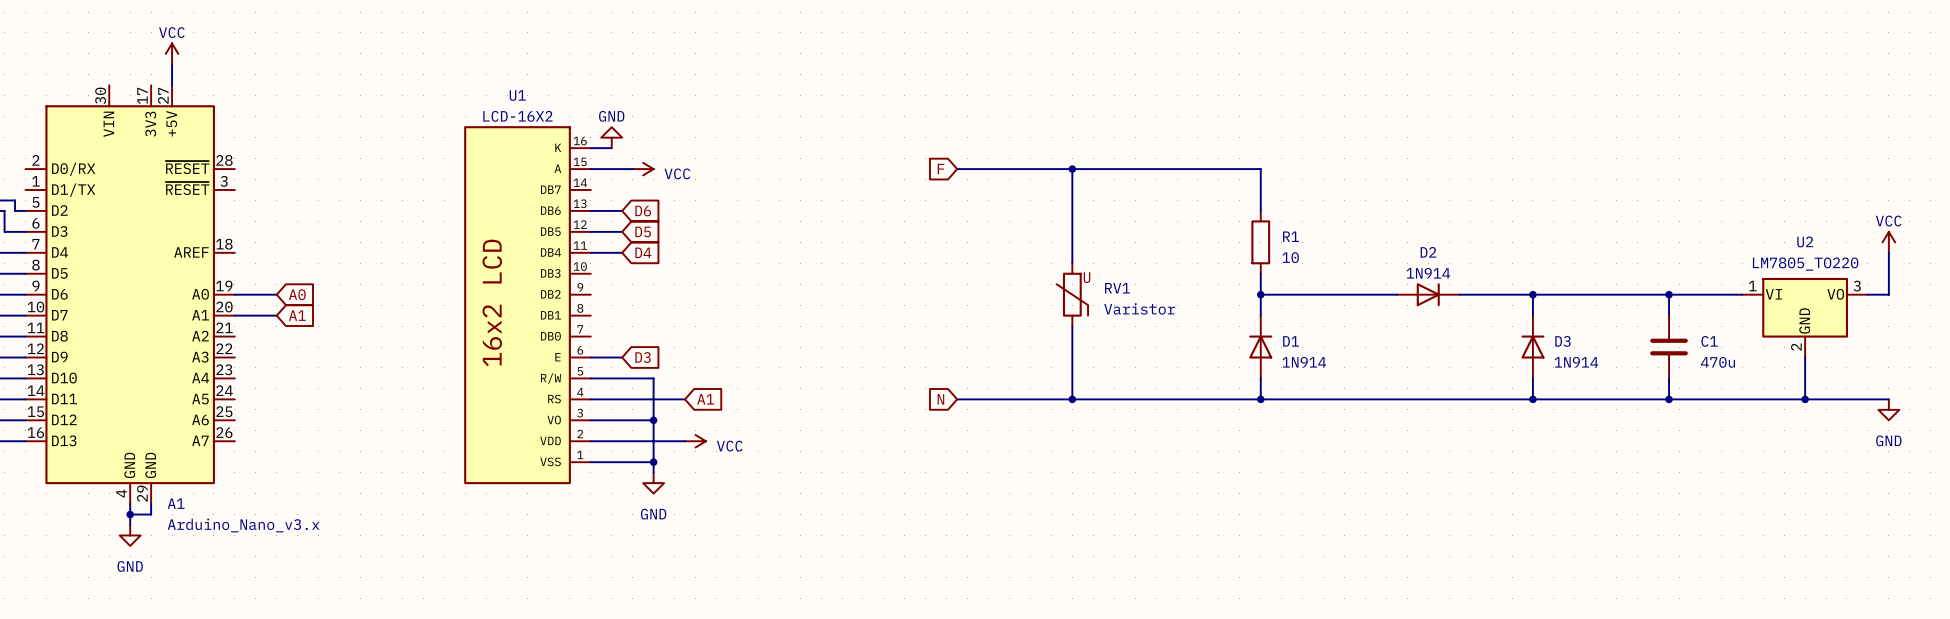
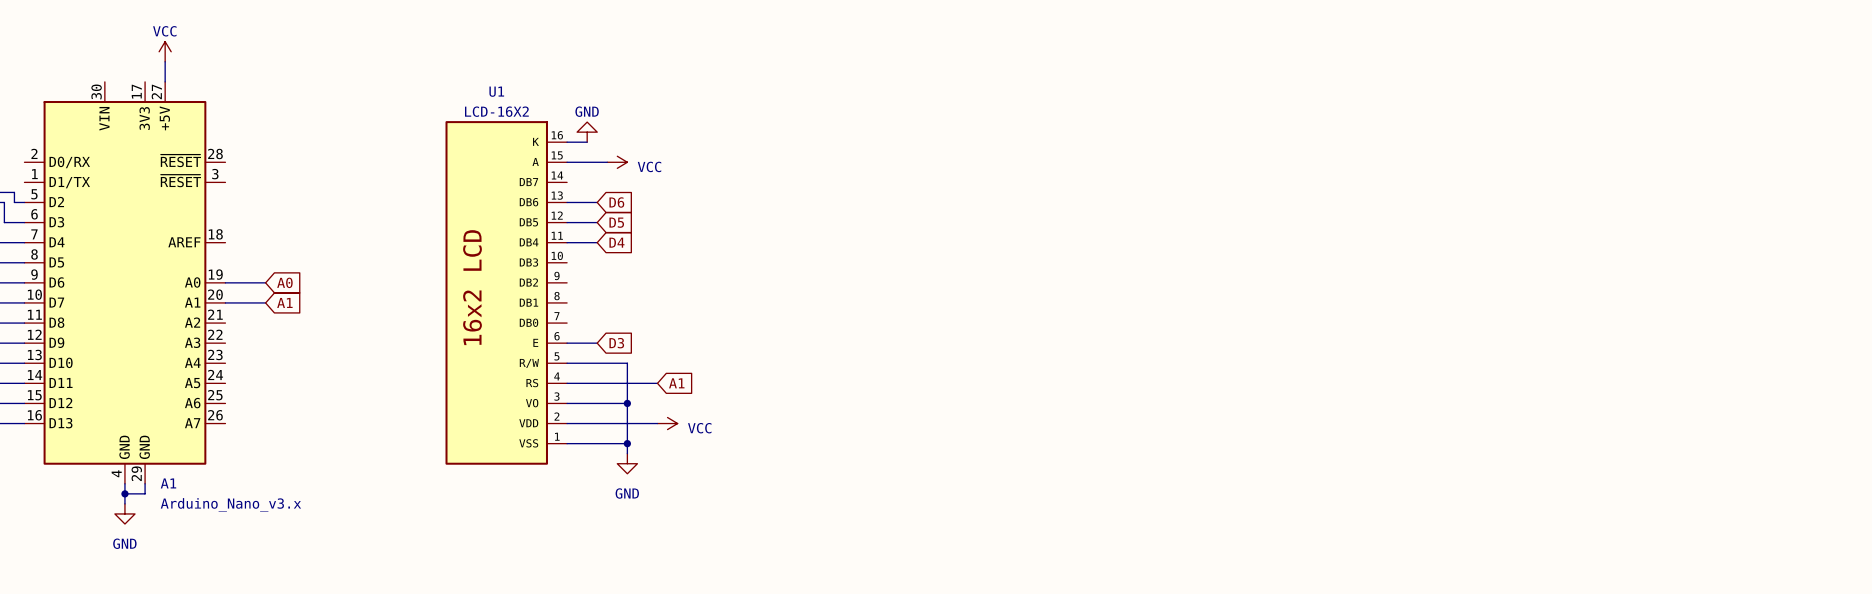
global label: F (941, 169) -> none
wire: (957, 169) (1260, 169) (1260, 210) -> none
wire: (1072, 169) (1072, 263) -> none
junction: (1072, 169) -> none
R1: 10 (1260, 242) -> none
power symbol: VCC (1888, 242) -> none
wire: (1888, 252) (1888, 294) (1867, 294) -> none
wire: (1260, 273) (1260, 315) -> none
RV1: Varistor (1072, 294) -> none
wire: (1260, 294) (1396, 294) -> none
junction: (1260, 294) -> none
D2: 1N914 (1428, 294) -> none
wire: (1459, 294) (1742, 294) -> none
wire: (1532, 294) (1532, 315) -> none
junction: (1532, 294) -> none
wire: (1669, 294) (1669, 315) -> none
junction: (1669, 294) -> none
U2: LM7805_TO220 (1805, 317) -> none
wire: (1072, 326) (1072, 399) -> none
D1: 1N914 (1260, 347) -> none
D3: 1N914 (1532, 347) -> none
C1: 470u (1669, 347) -> none
wire: (1805, 357) (1805, 399) -> none
wire: (1260, 378) (1260, 399) -> none
wire: (1532, 378) (1532, 399) -> none
wire: (1669, 378) (1669, 399) -> none
global label: N (940, 399) -> none
wire: (957, 399) (1888, 399) -> none
junction: (1072, 399) -> none
junction: (1260, 399) -> none
junction: (1532, 399) -> none
junction: (1669, 399) -> none
junction: (1805, 399) -> none
power symbol: GND (1888, 409) -> none

